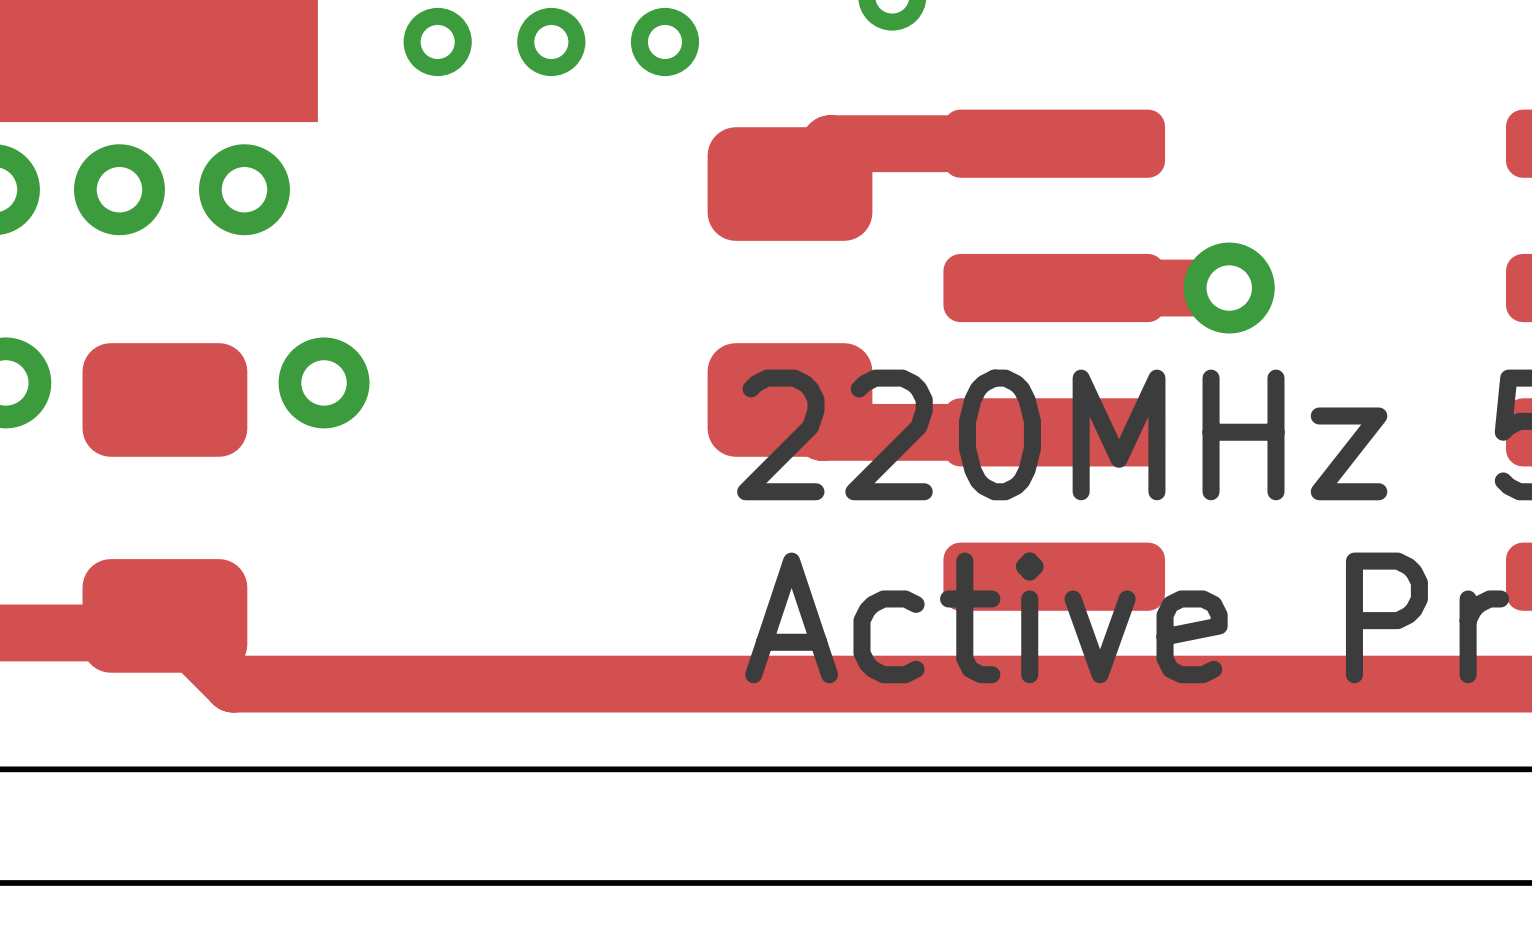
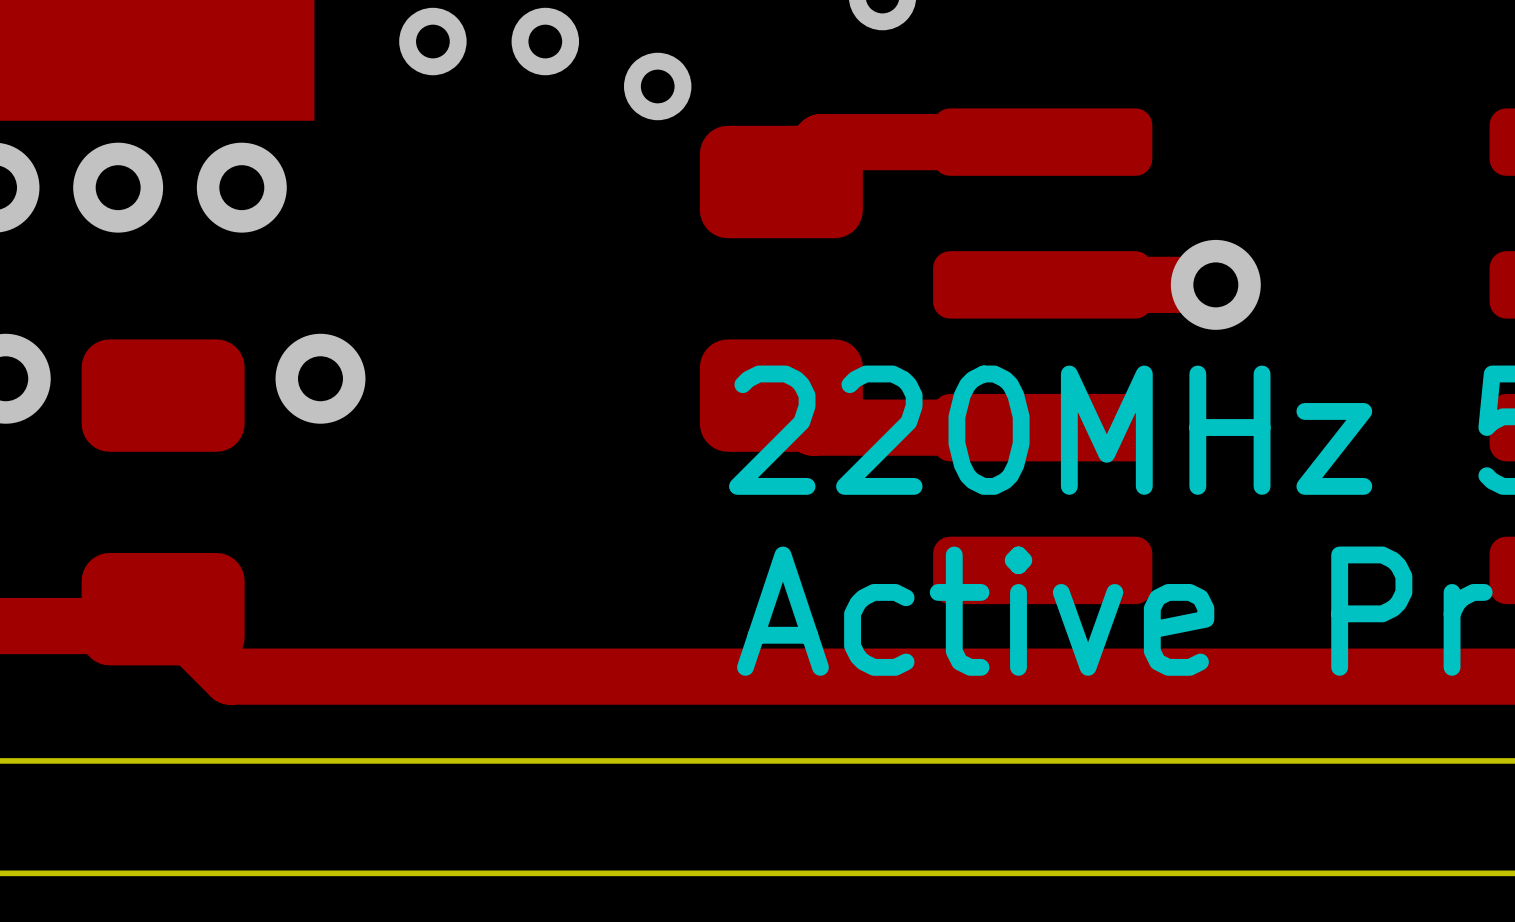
via position: (664, 41) -> (657, 86)

